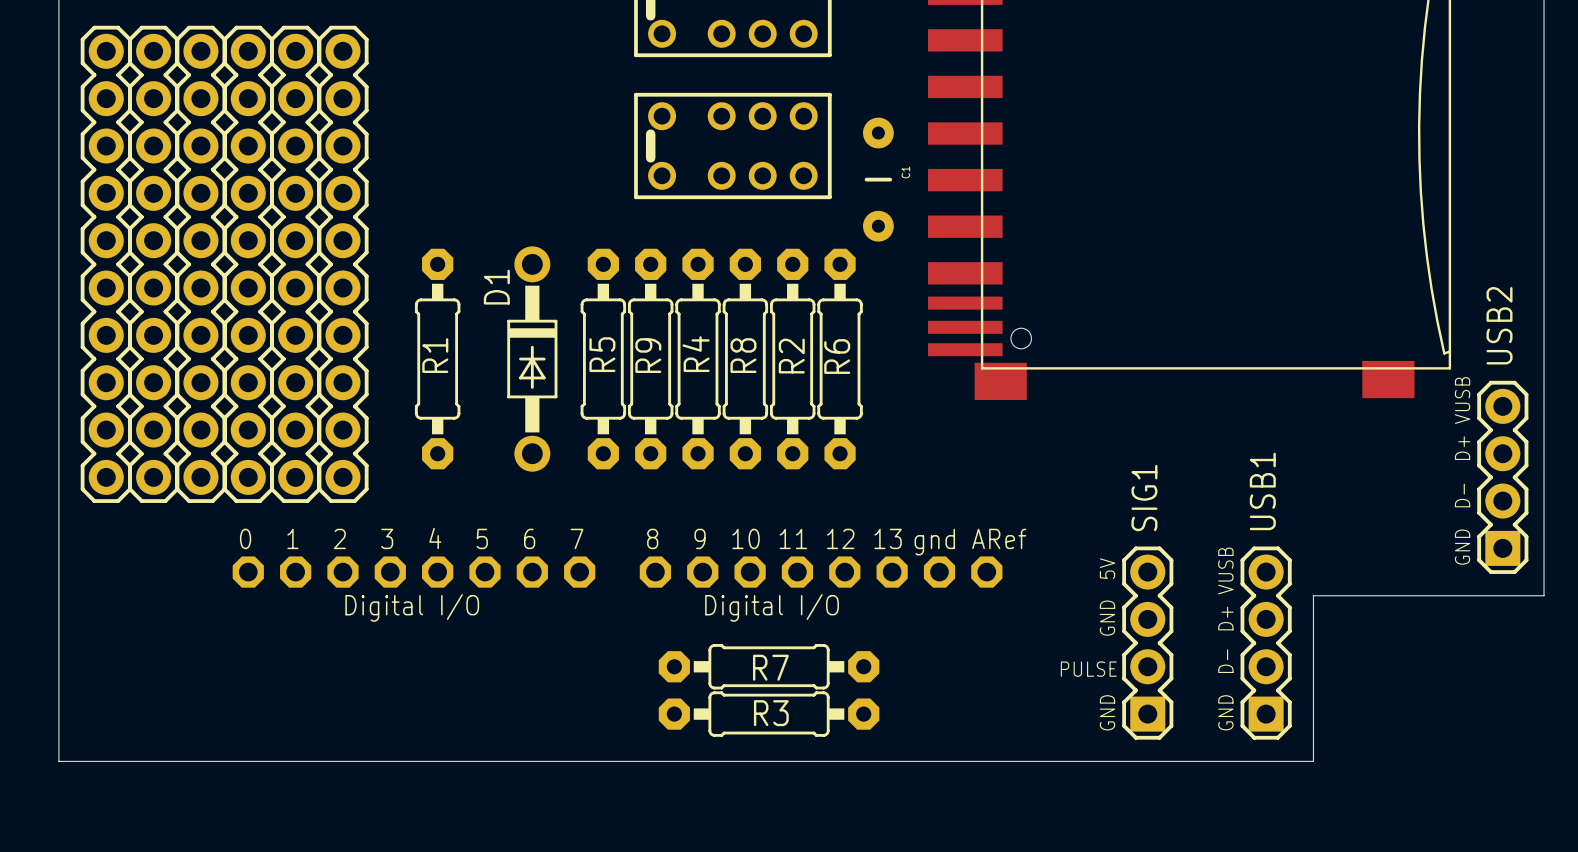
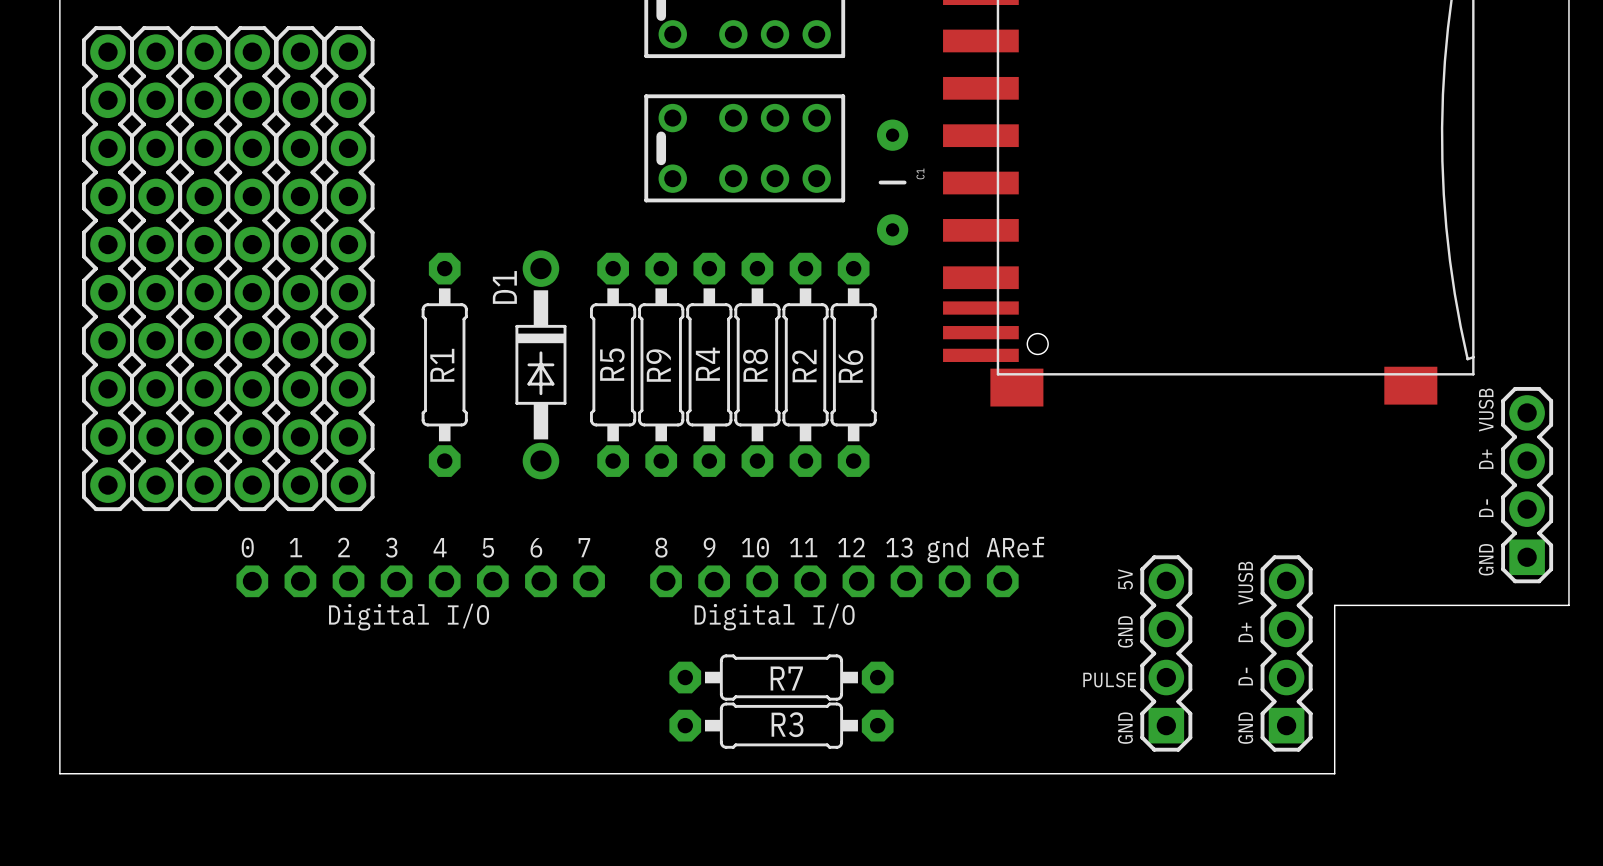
USB2 name: USB2 (1499, 325) -> none
USB1 name: USB1 (1262, 491) -> none
SIG1 name: SIG1 (1144, 498) -> none

